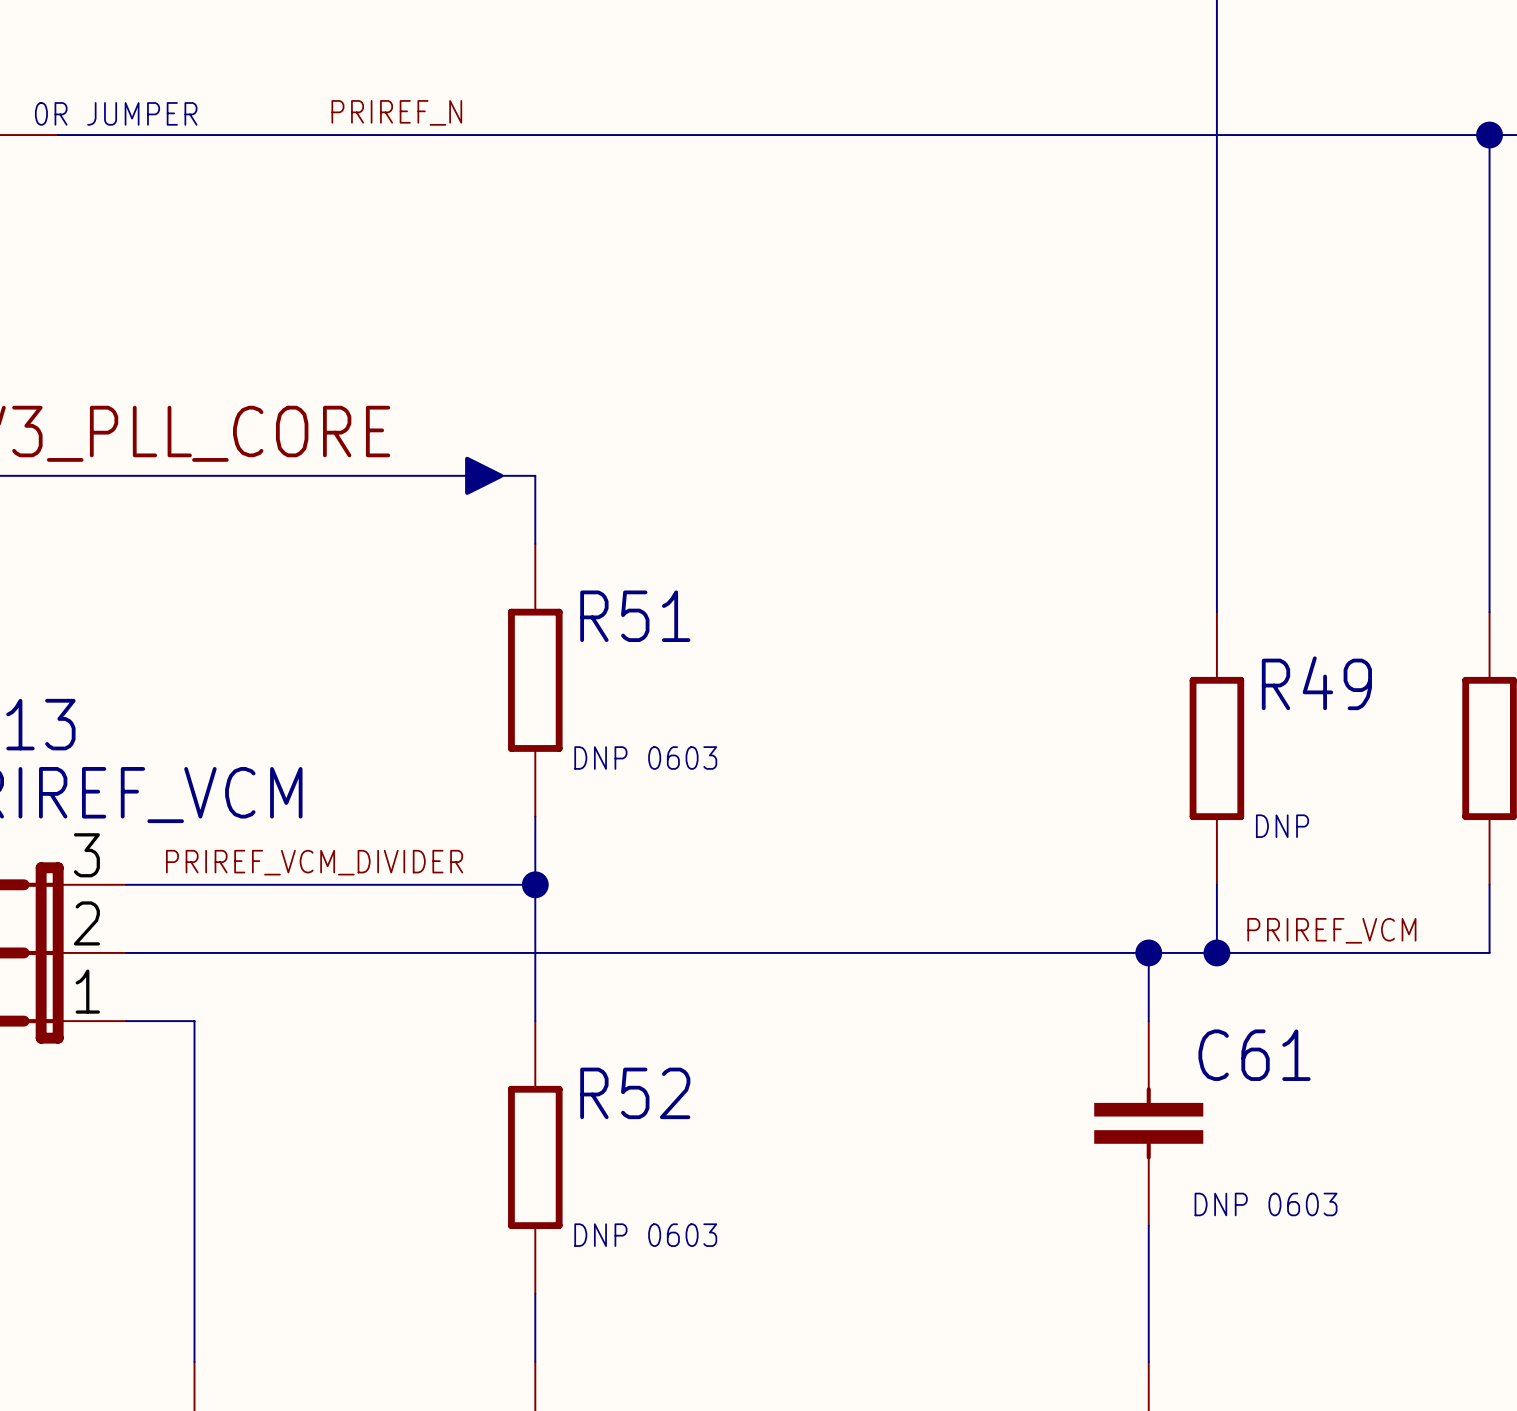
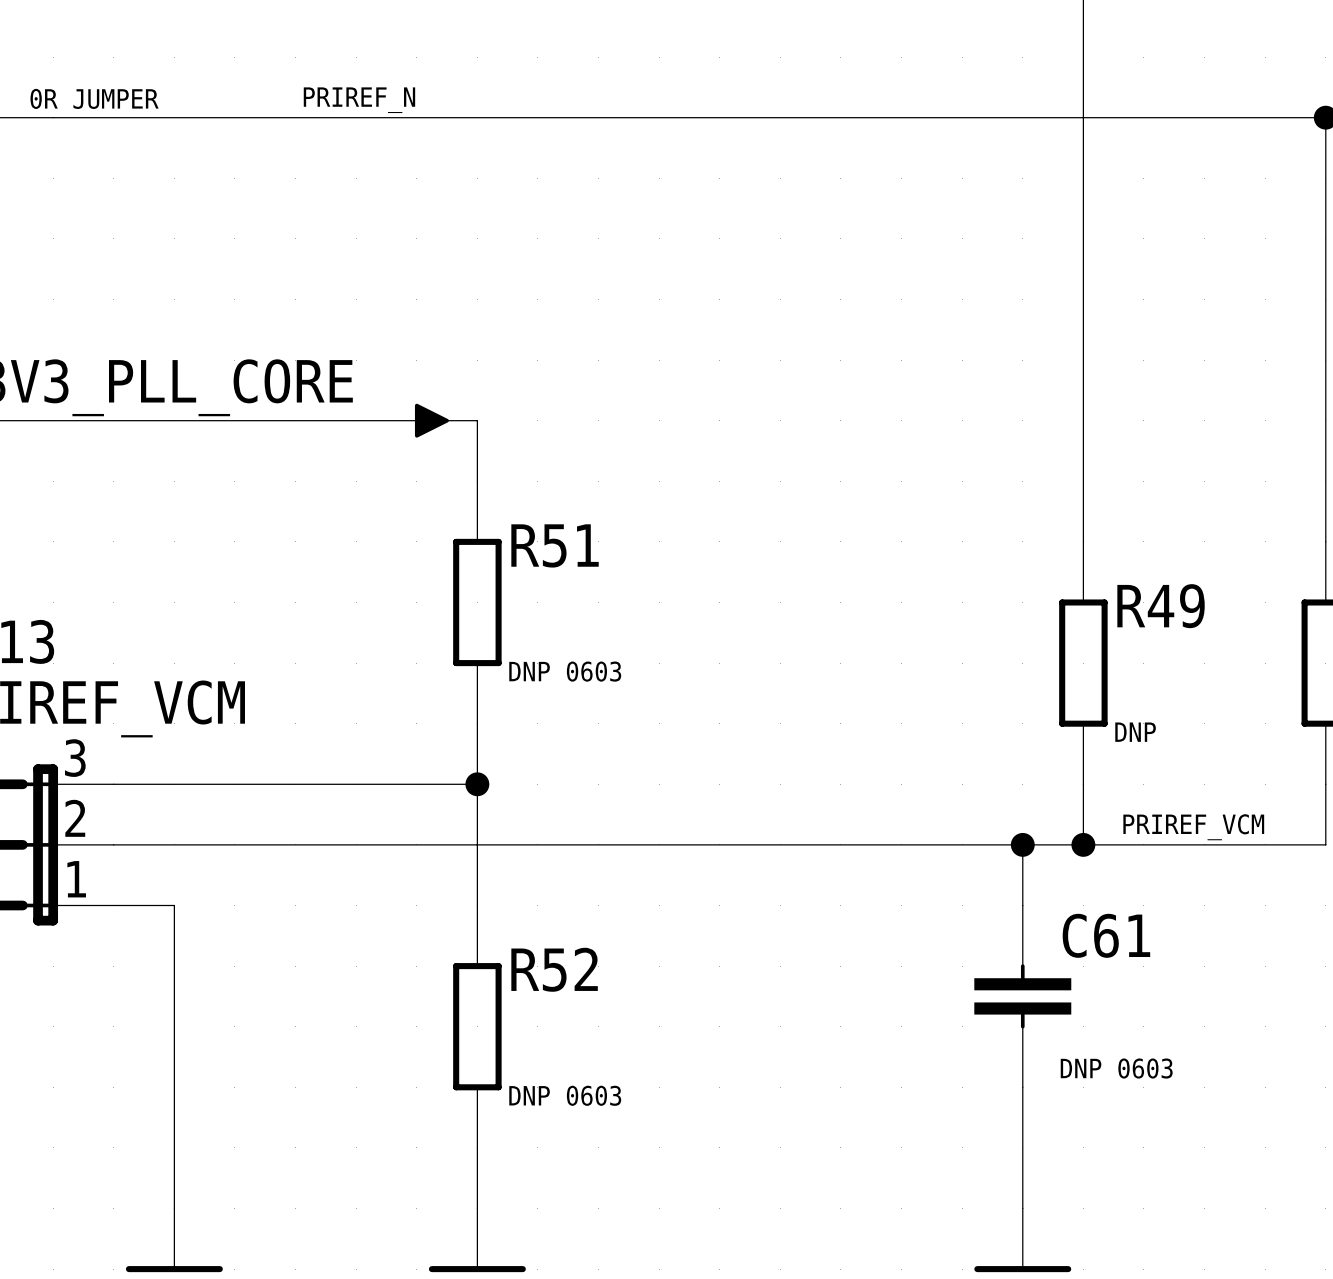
label: PRIREF_VCM_DIVIDER (314, 862) -> none

